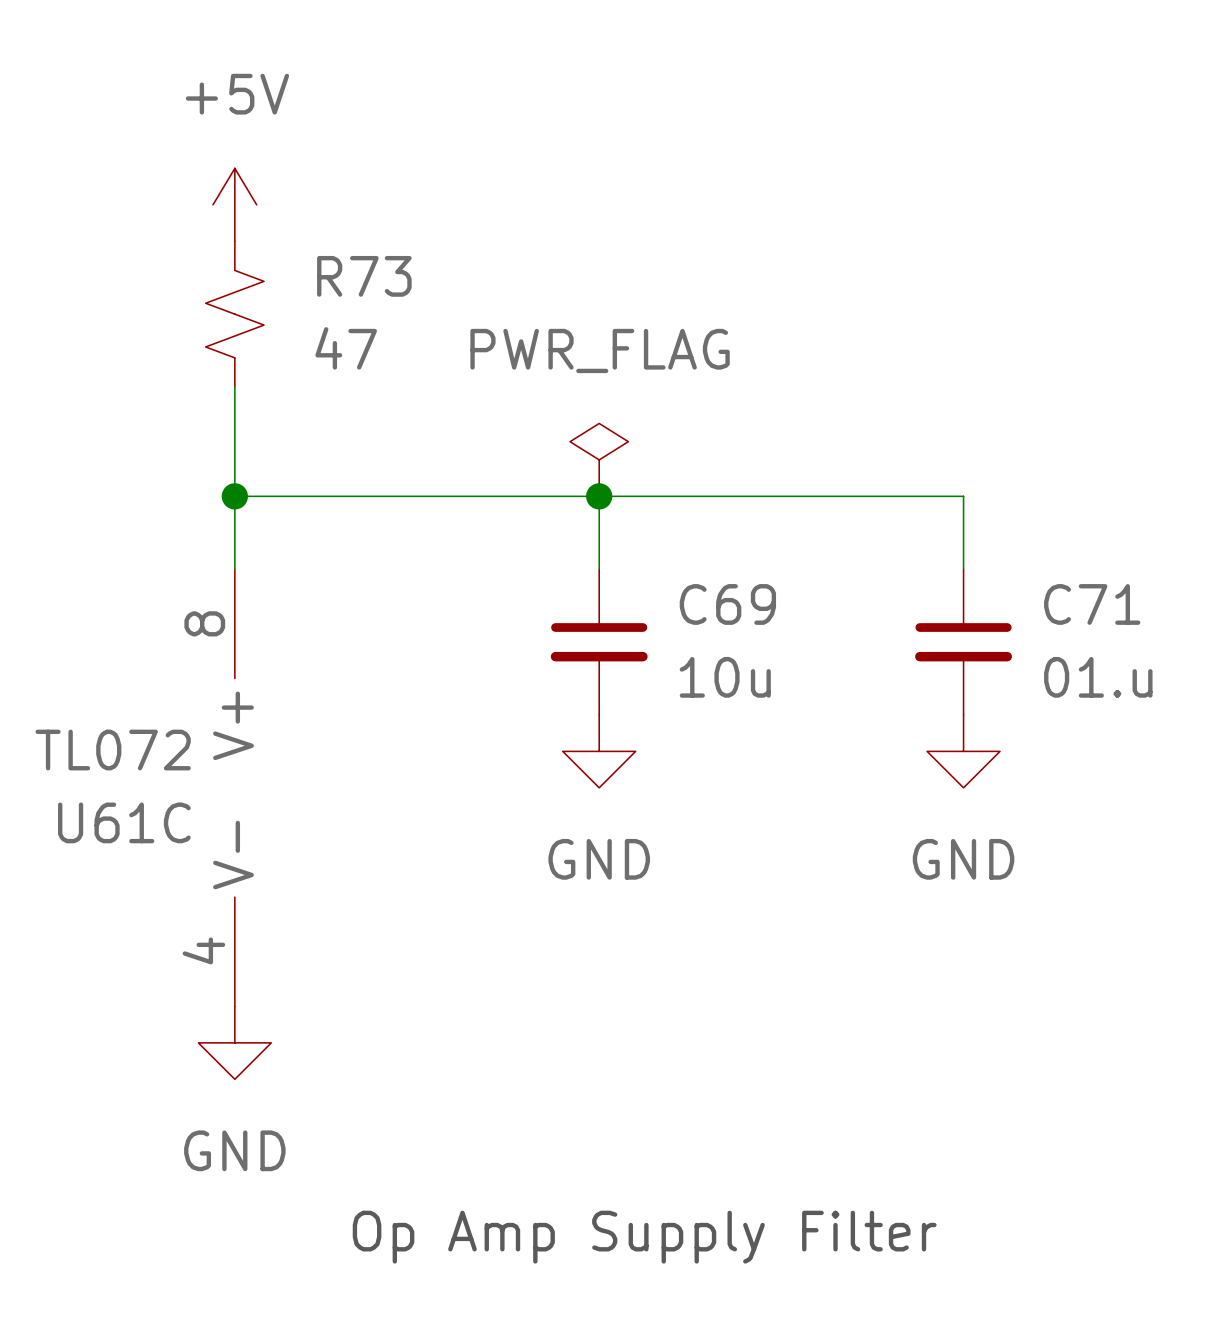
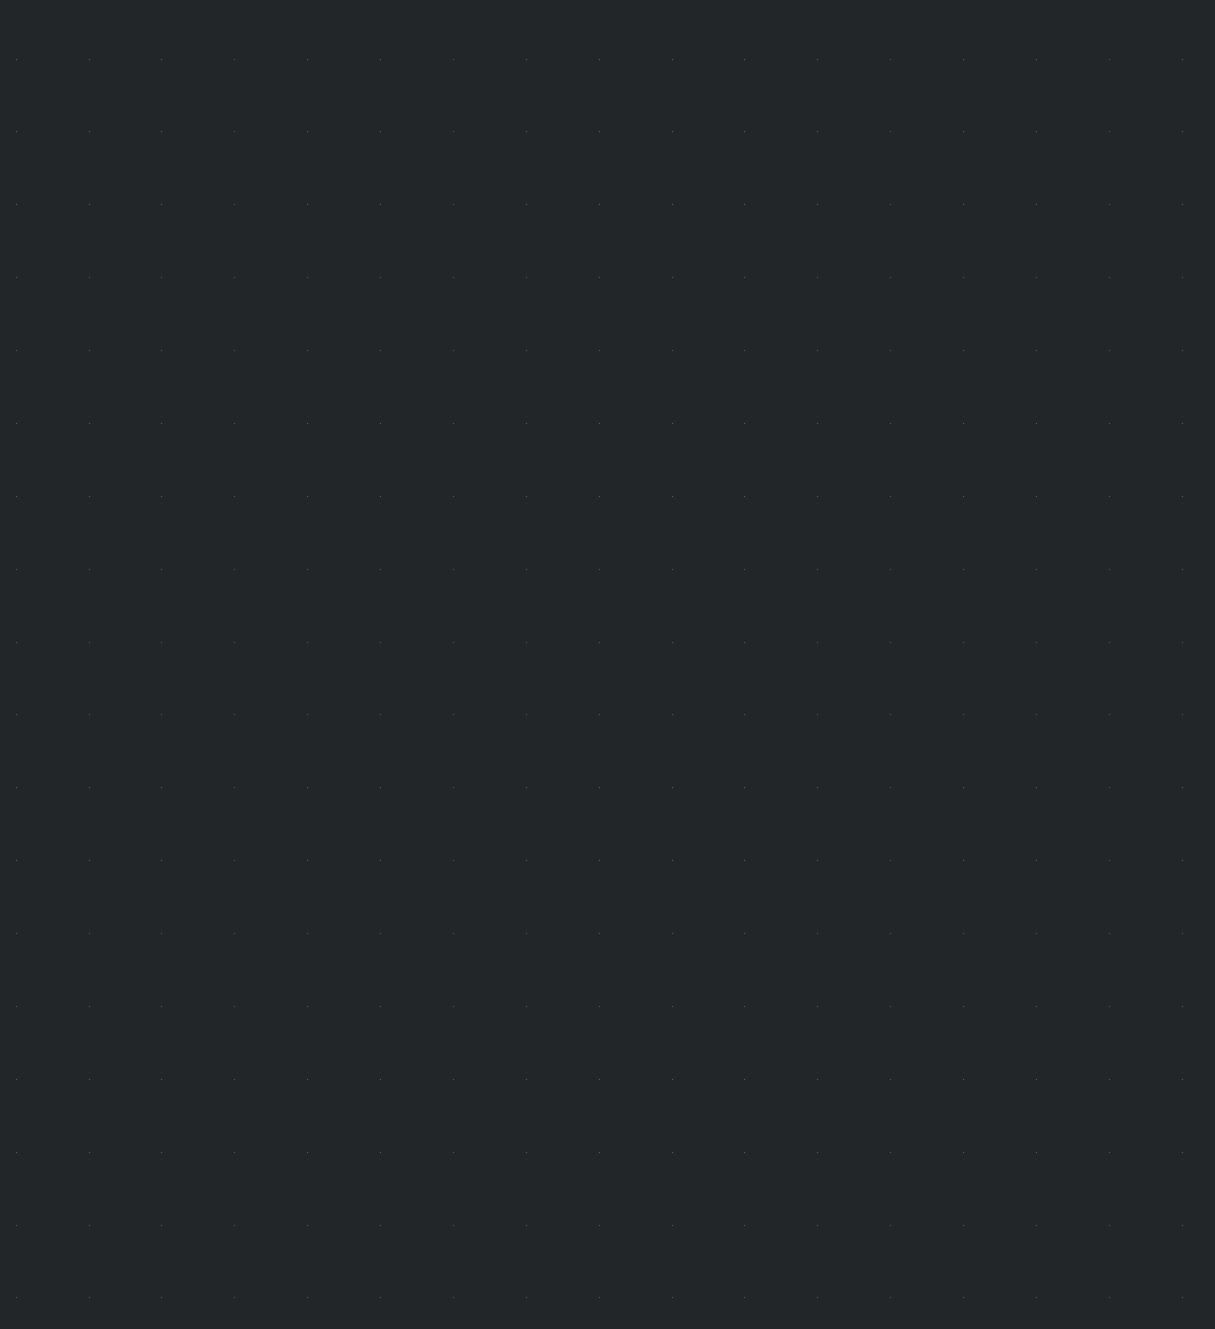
power symbol: +5V (234, 204) -> none
R73: 47 (234, 314) -> none
wire: (234, 387) (234, 569) -> none
power symbol: PWR_FLAG (599, 459) -> none
wire: (234, 496) (963, 496) (963, 569) -> none
junction: (234, 496) -> none
wire: (599, 496) (599, 569) -> none
junction: (599, 496) -> none
C69: 10u (599, 642) -> none
C71: 01.u (963, 642) -> none
power symbol: GND (599, 751) -> none
power symbol: GND (963, 751) -> none
U61C: TL072 (234, 787) -> none
power symbol: GND (234, 1042) -> none
text: Op Amp Supply Filter (644, 1237) -> none

